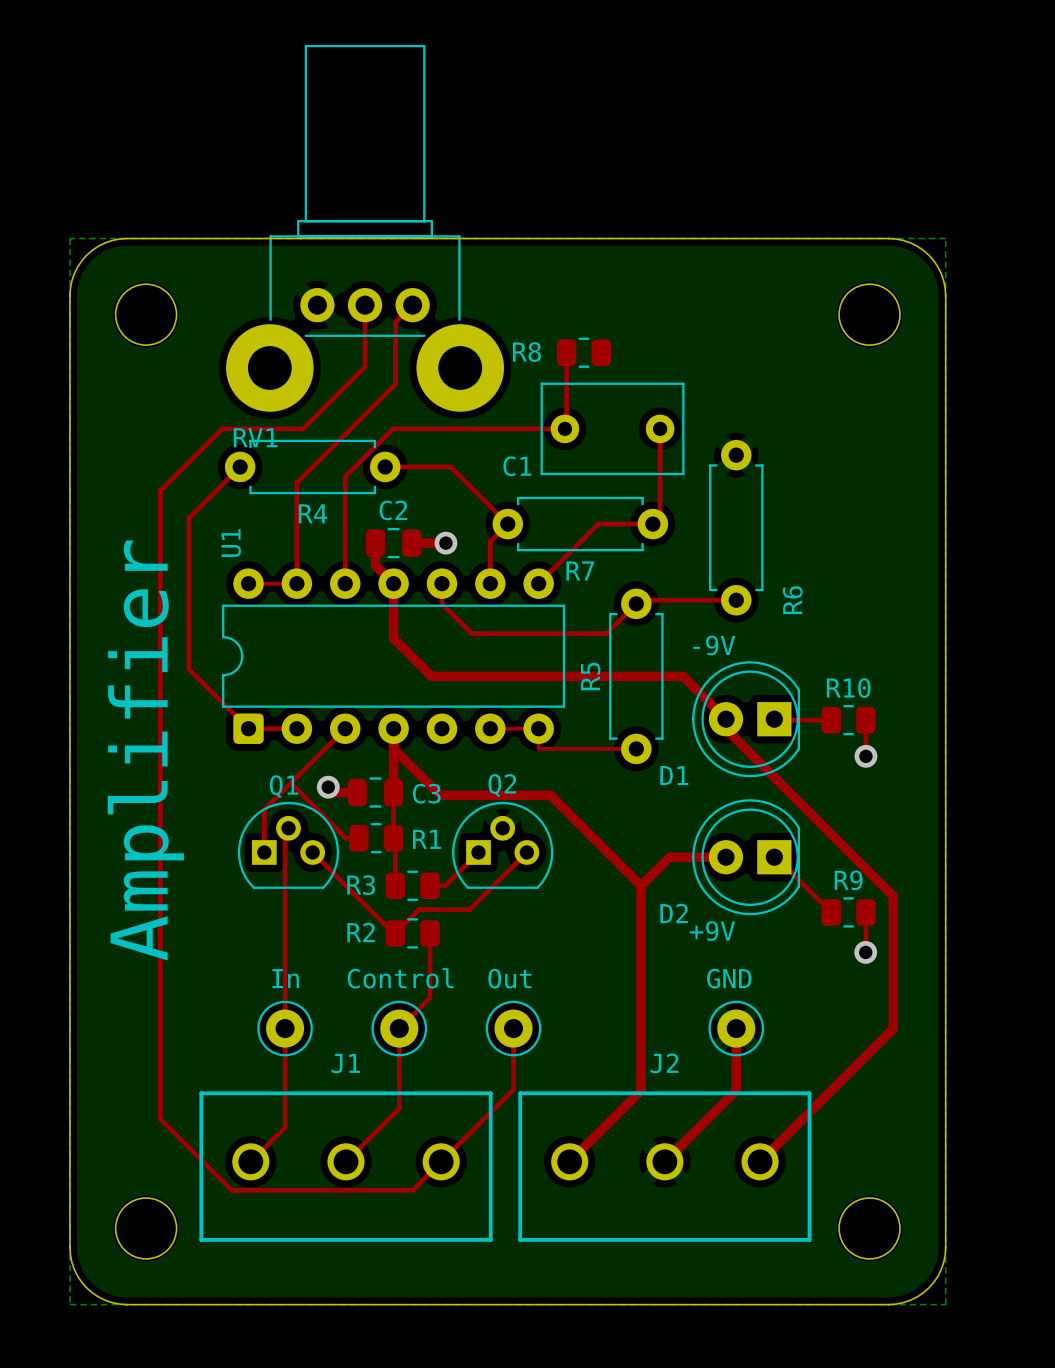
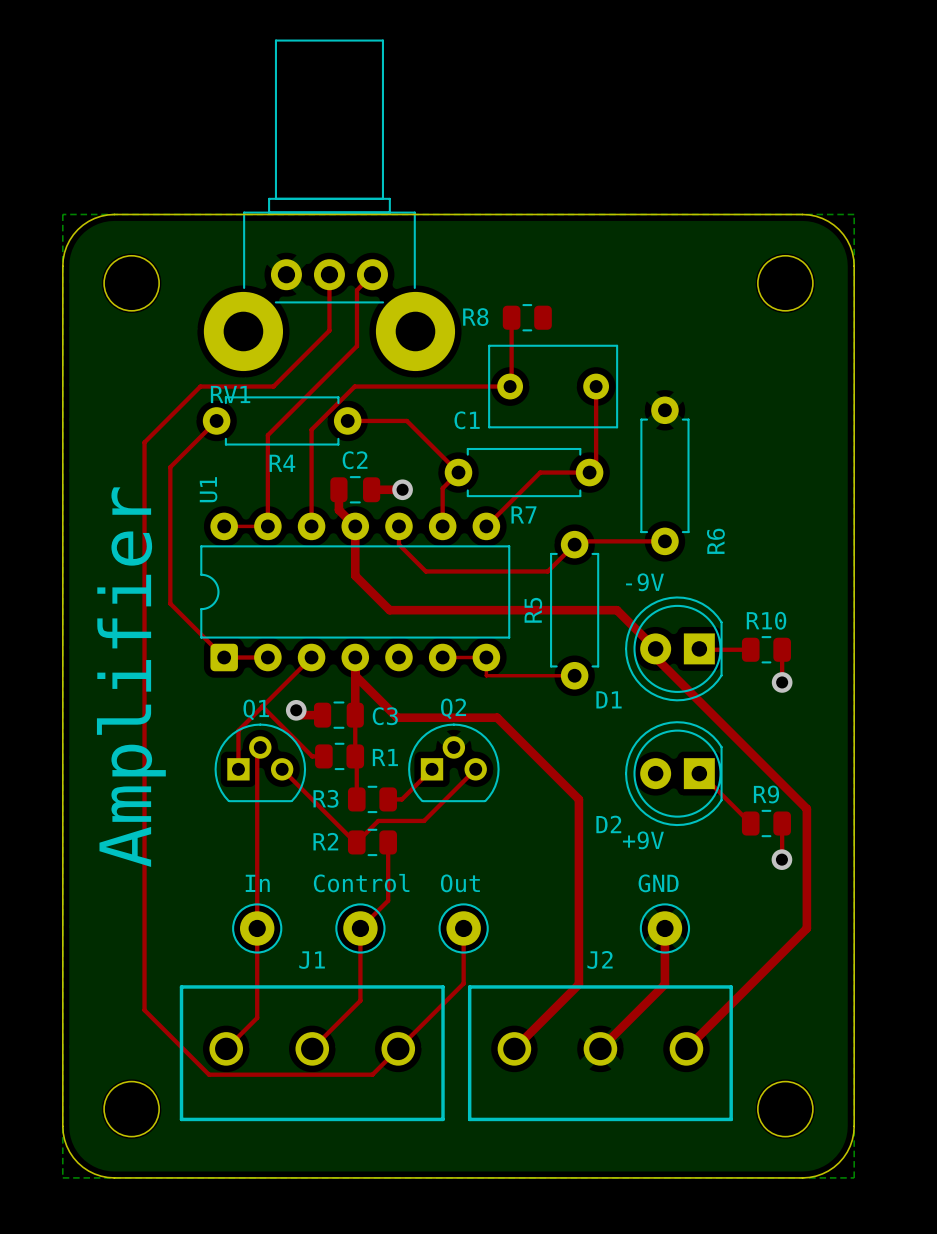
top track: (725, 857) (669, 857) (641, 885) -> none

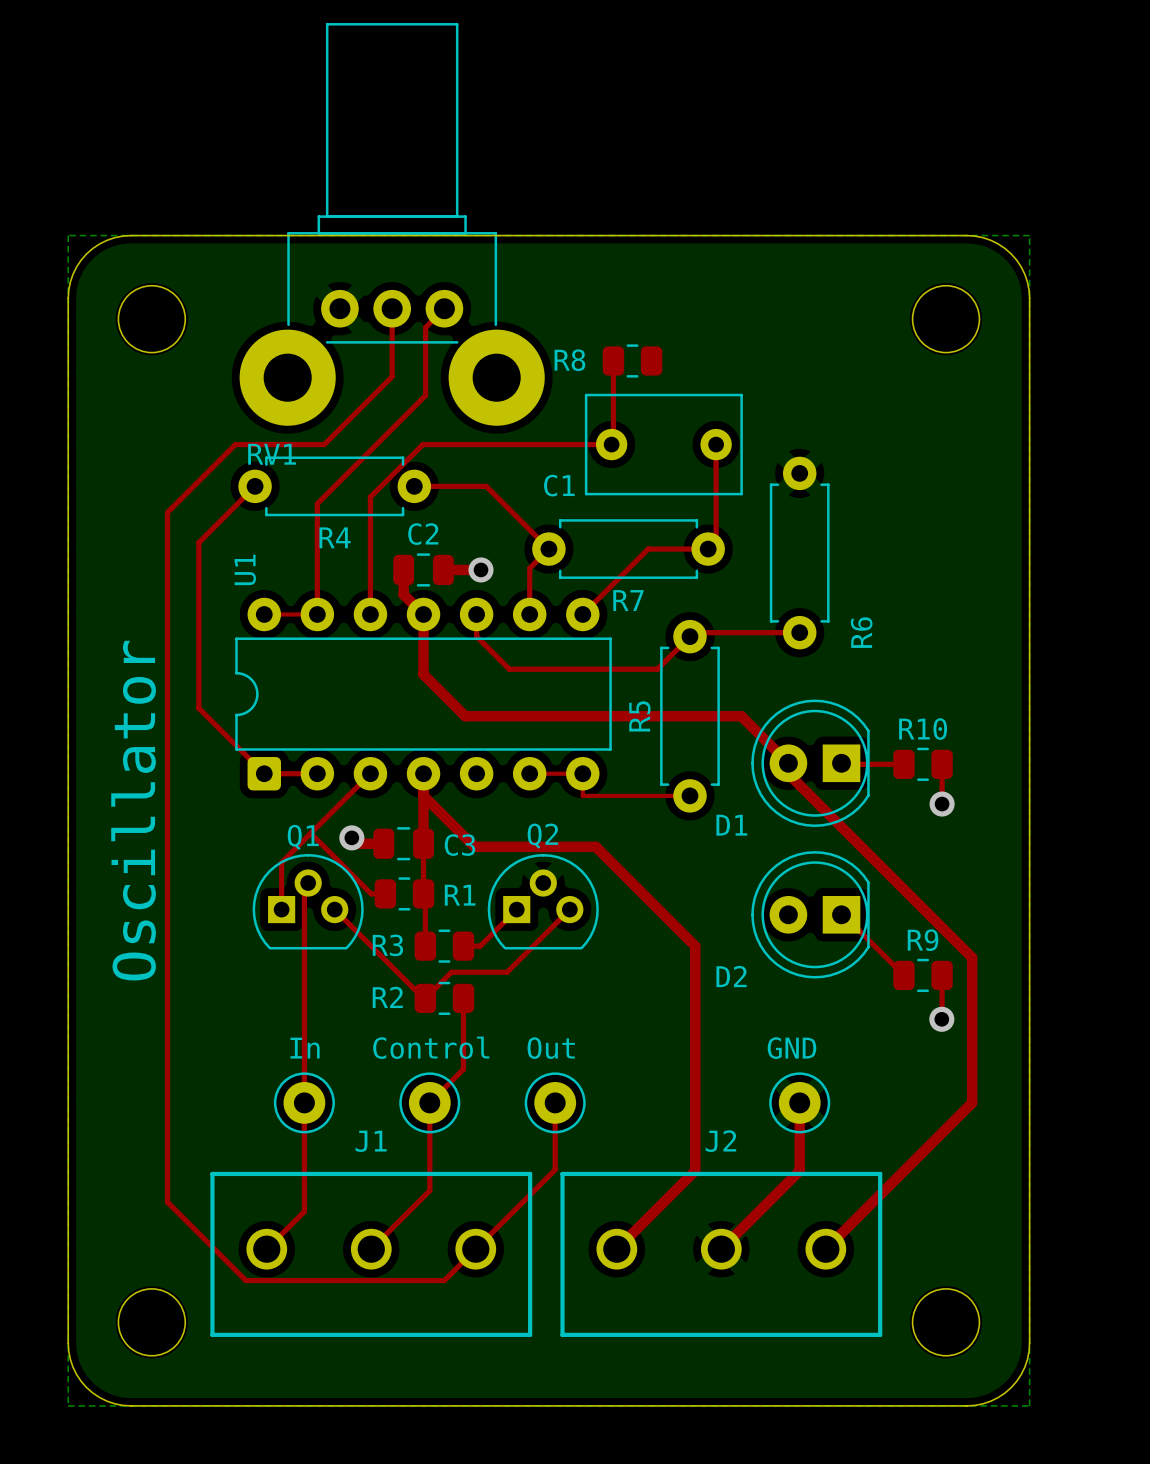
text: -9V (644, 582) -> none
text: Amplifier (131, 677) -> none
text: none -> Oscillator (133, 810)
text: +9V (643, 840) -> none

